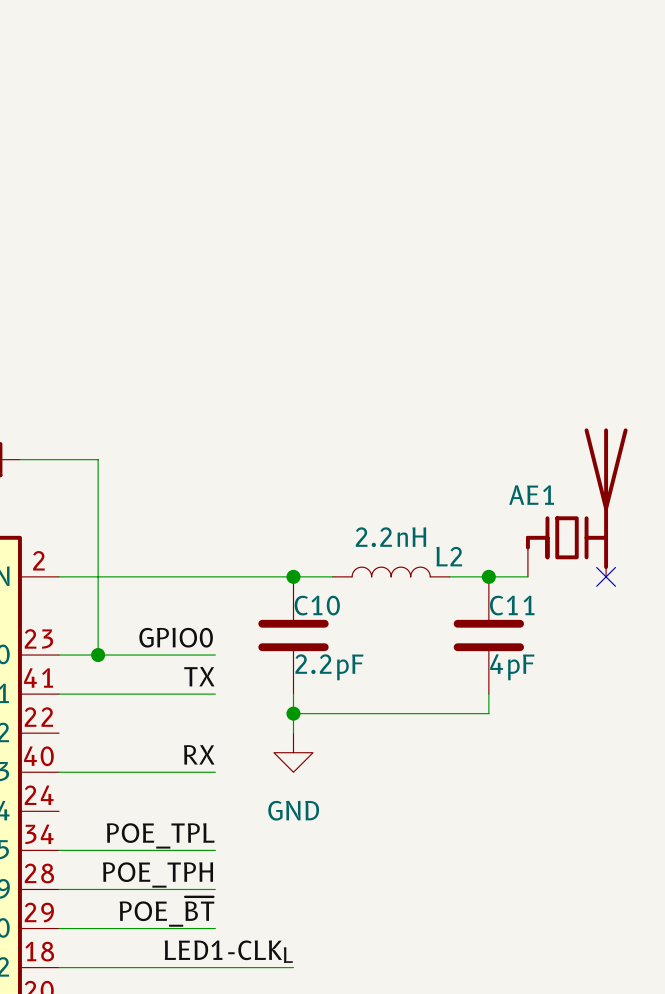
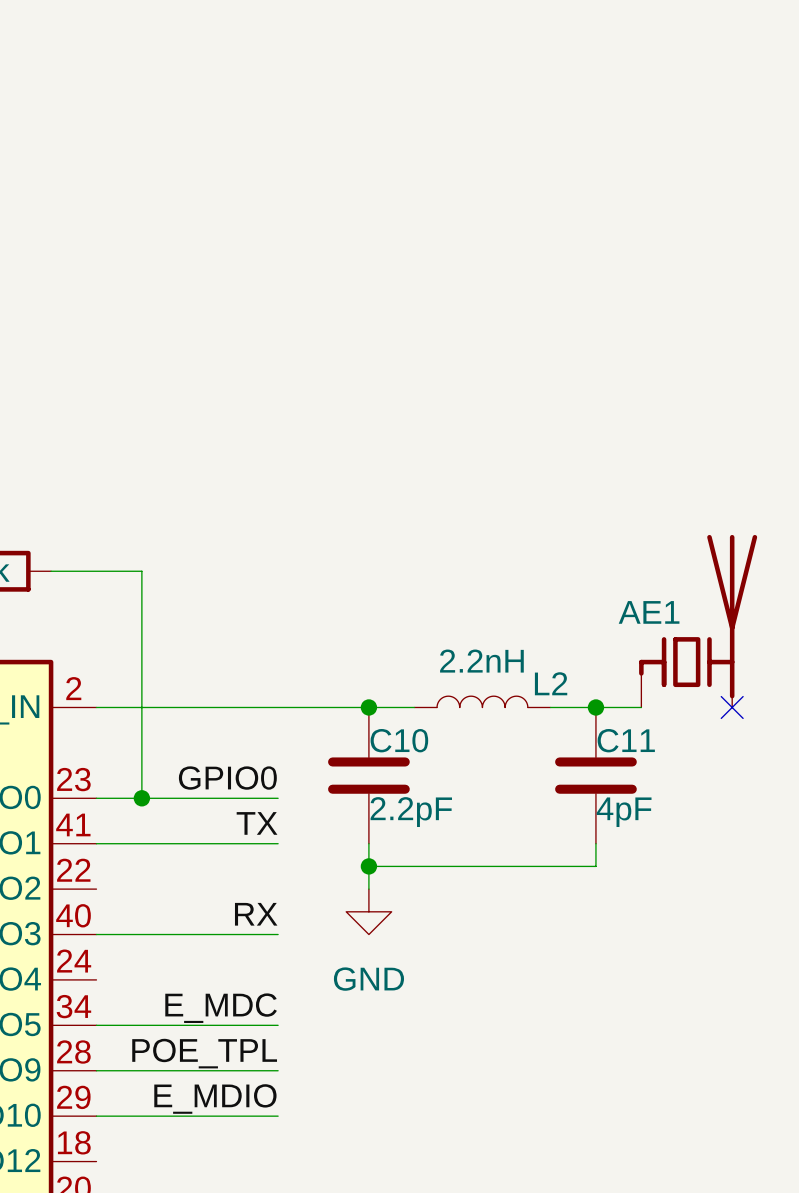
label: POE_TPL (160, 835) -> E_MDC (221, 1008)
label: POE_TPH (157, 874) -> POE_TPL (204, 1053)
label: POE_~{BT} (166, 911) -> E_MDIO (215, 1099)
label: LED1-CLKL (228, 951) -> none
wire: (59, 967) (293, 967) -> none

